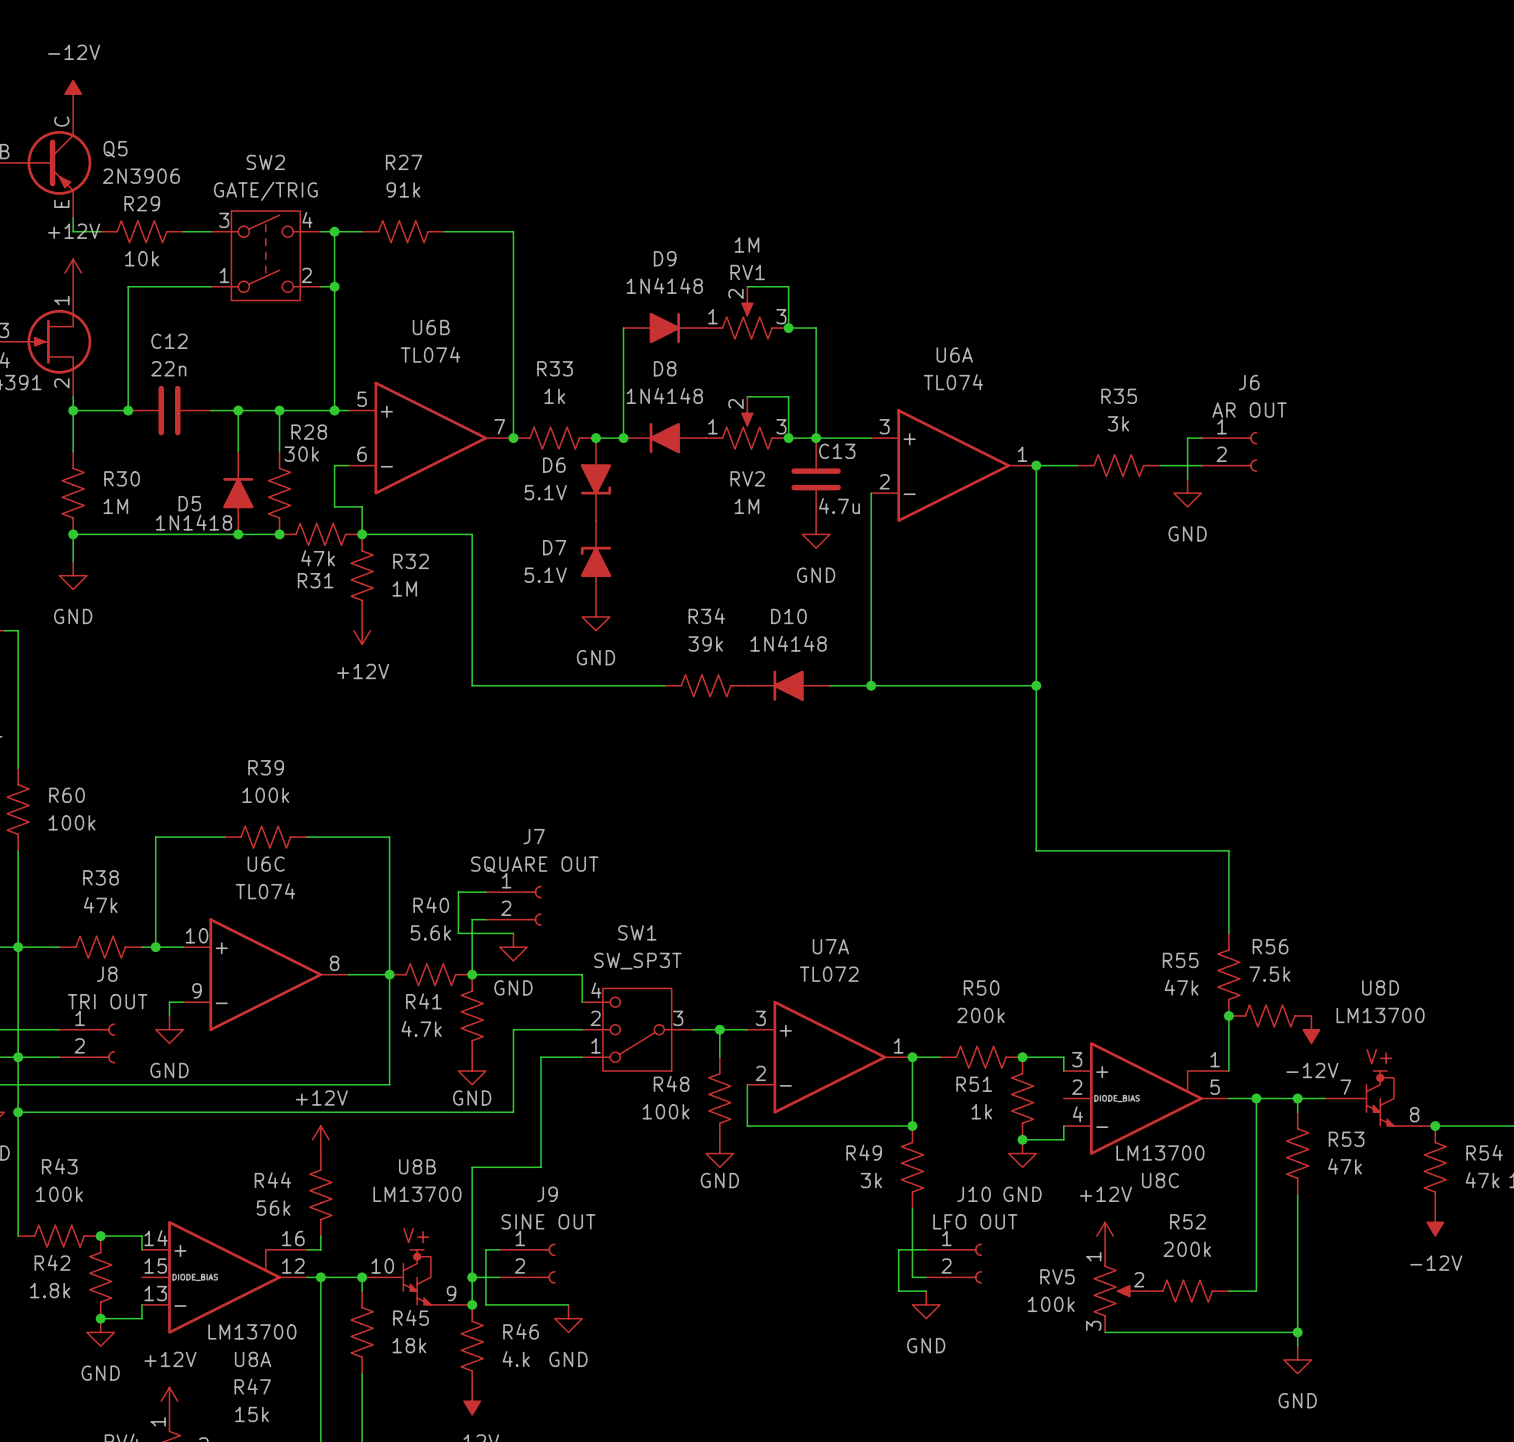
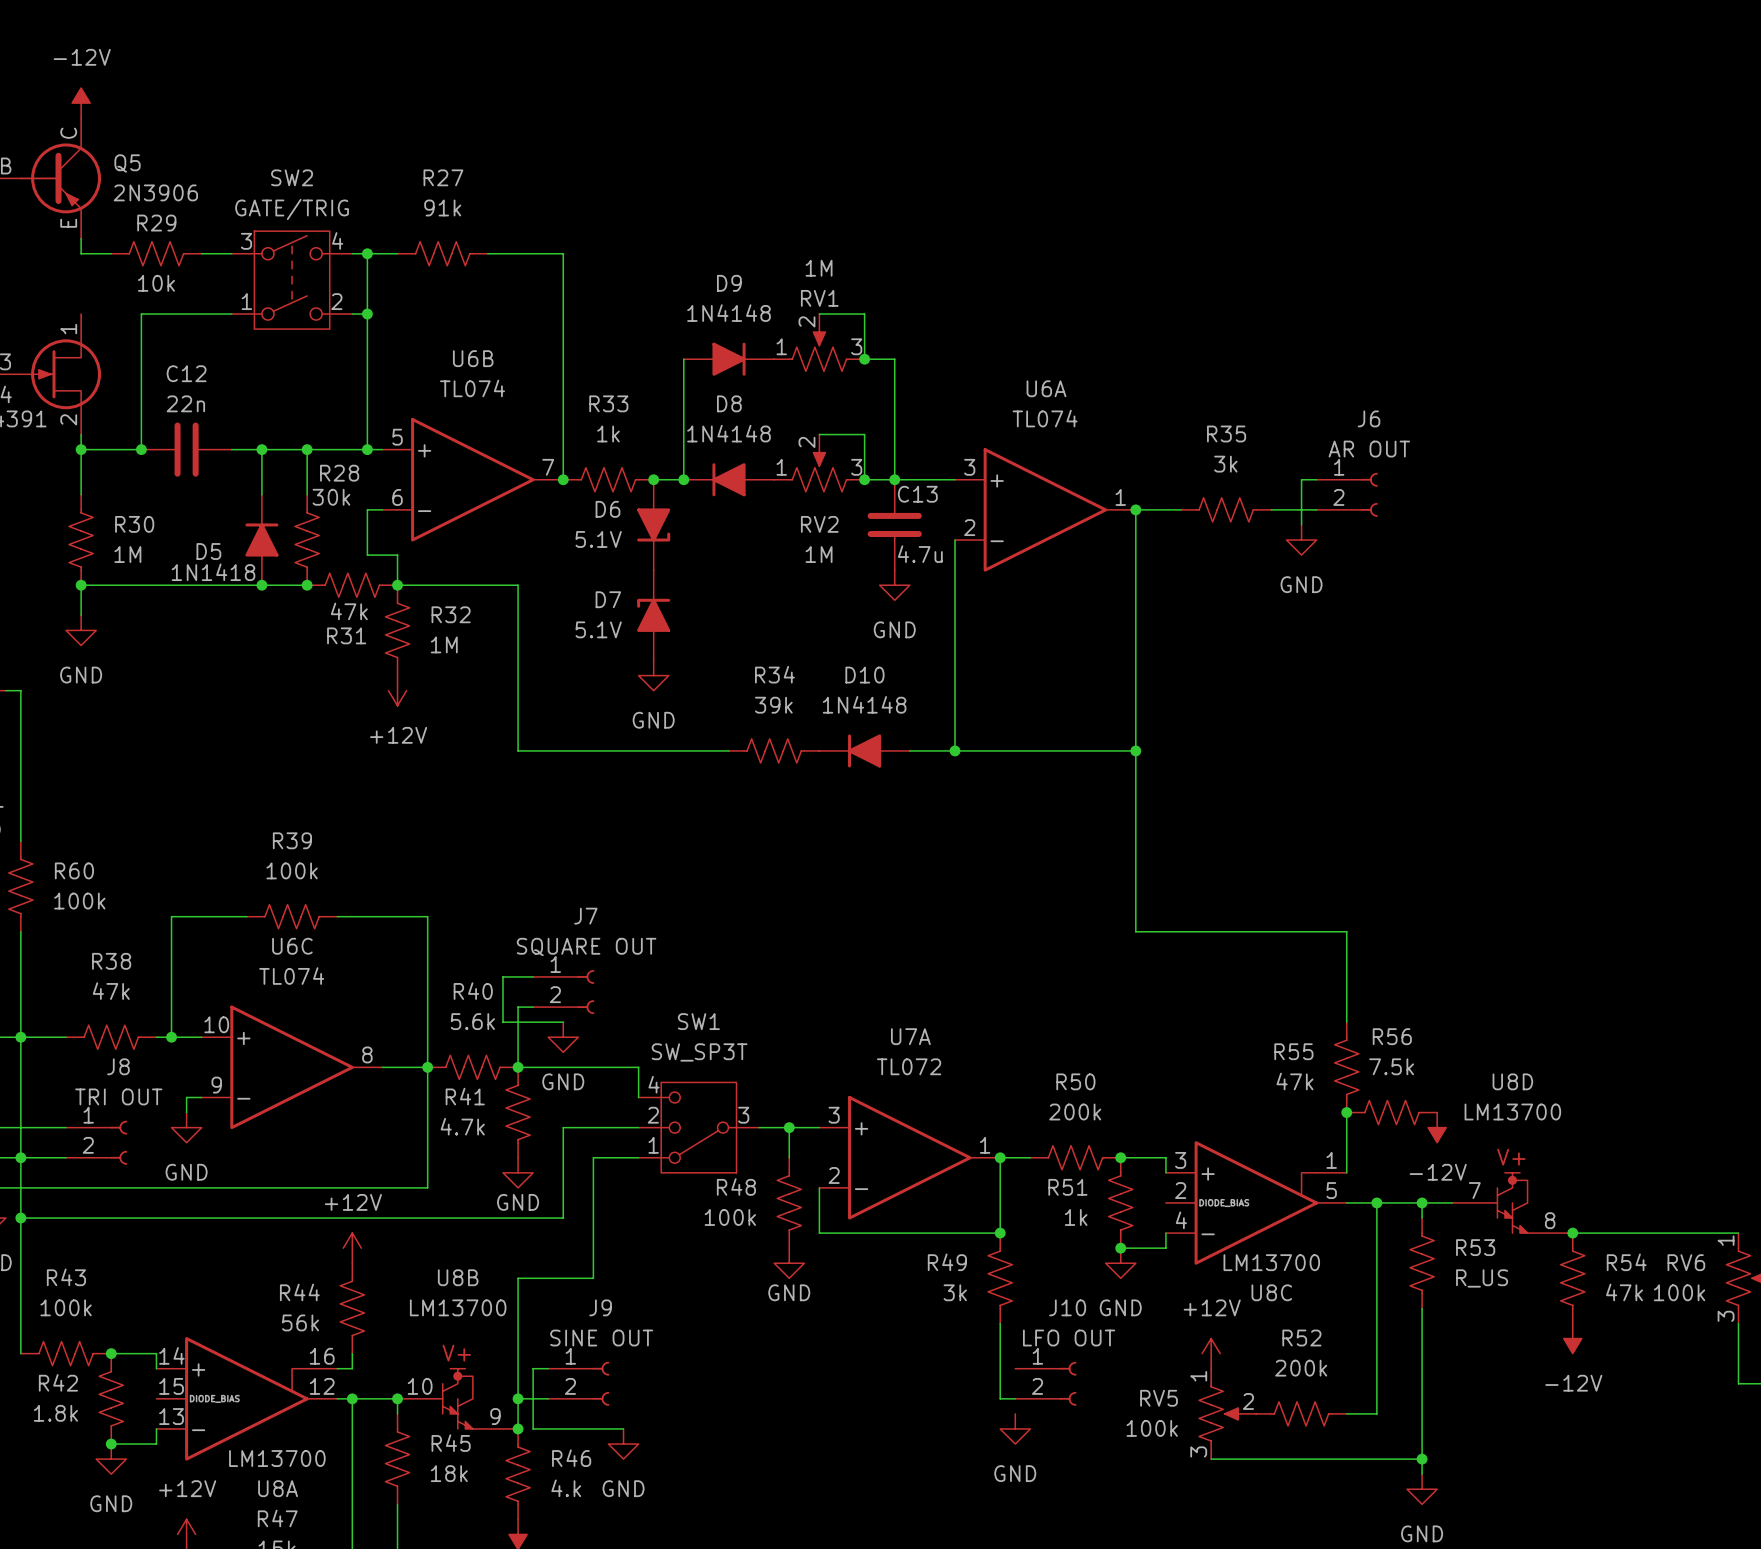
power symbol: +12V (73, 272) -> none
R53 value: 47k (1344, 1166) -> R_US (1482, 1278)
wire: (926, 1249) (898, 1249) (898, 1291) (926, 1291) -> none

